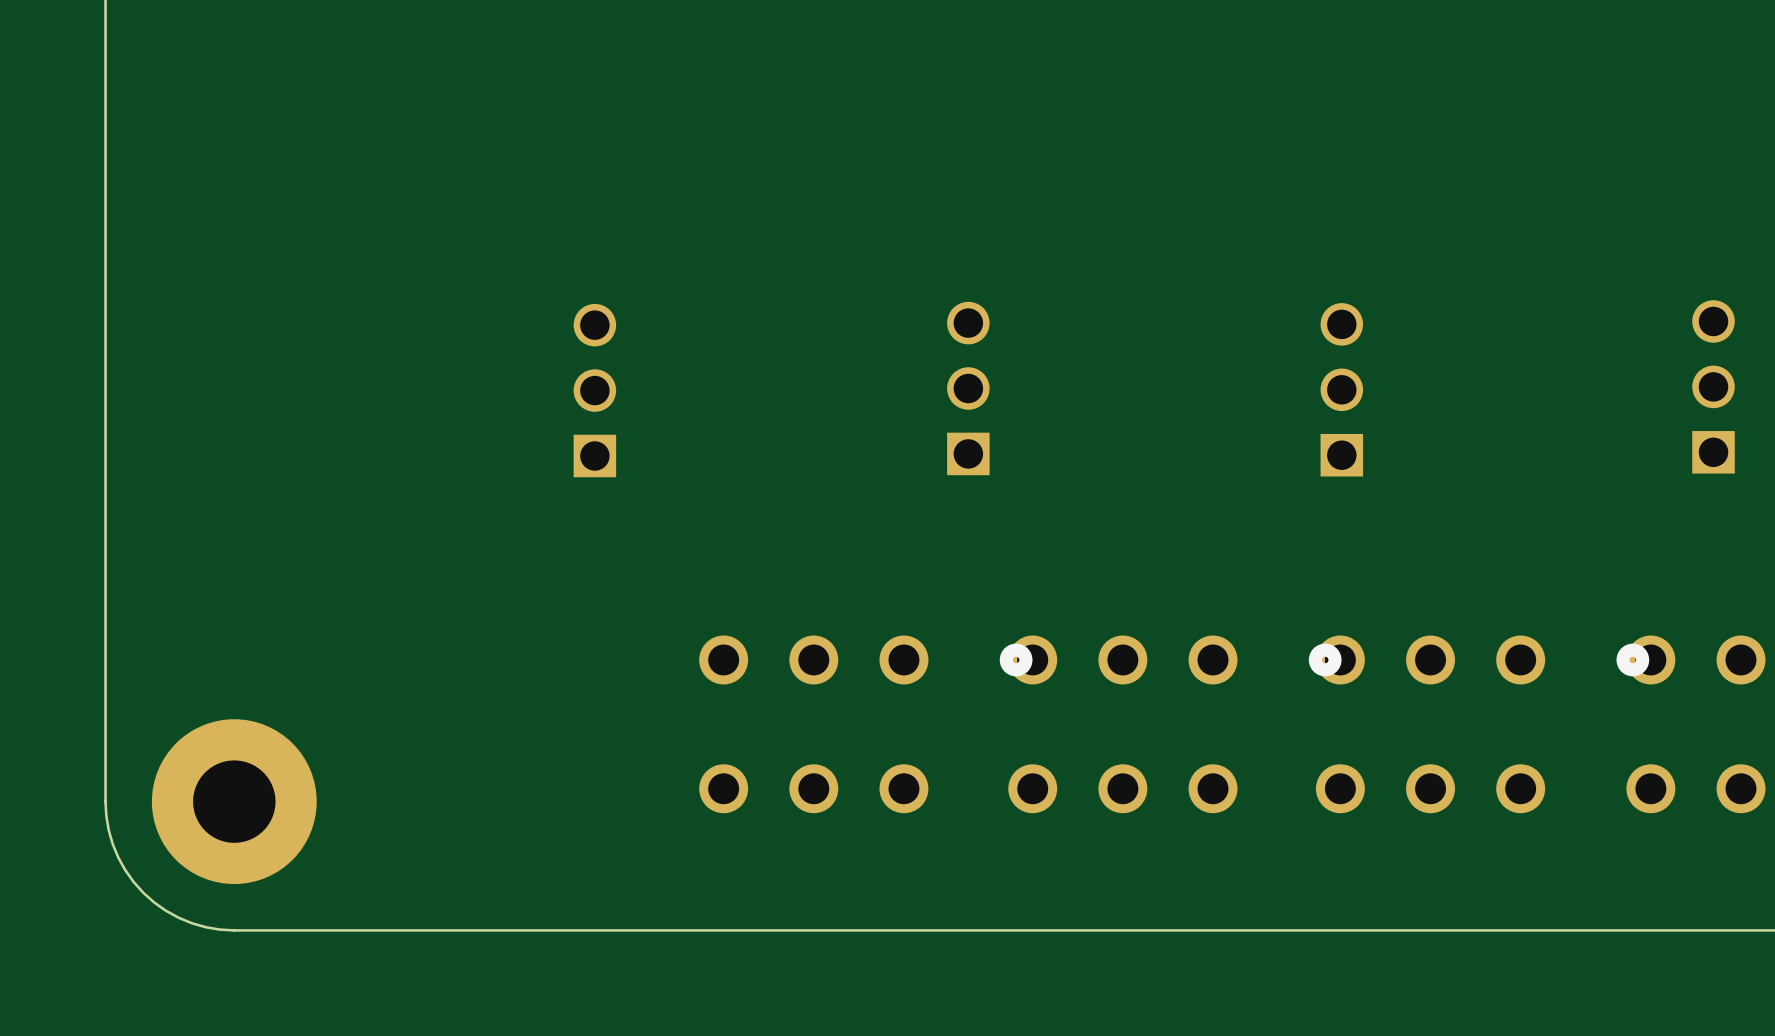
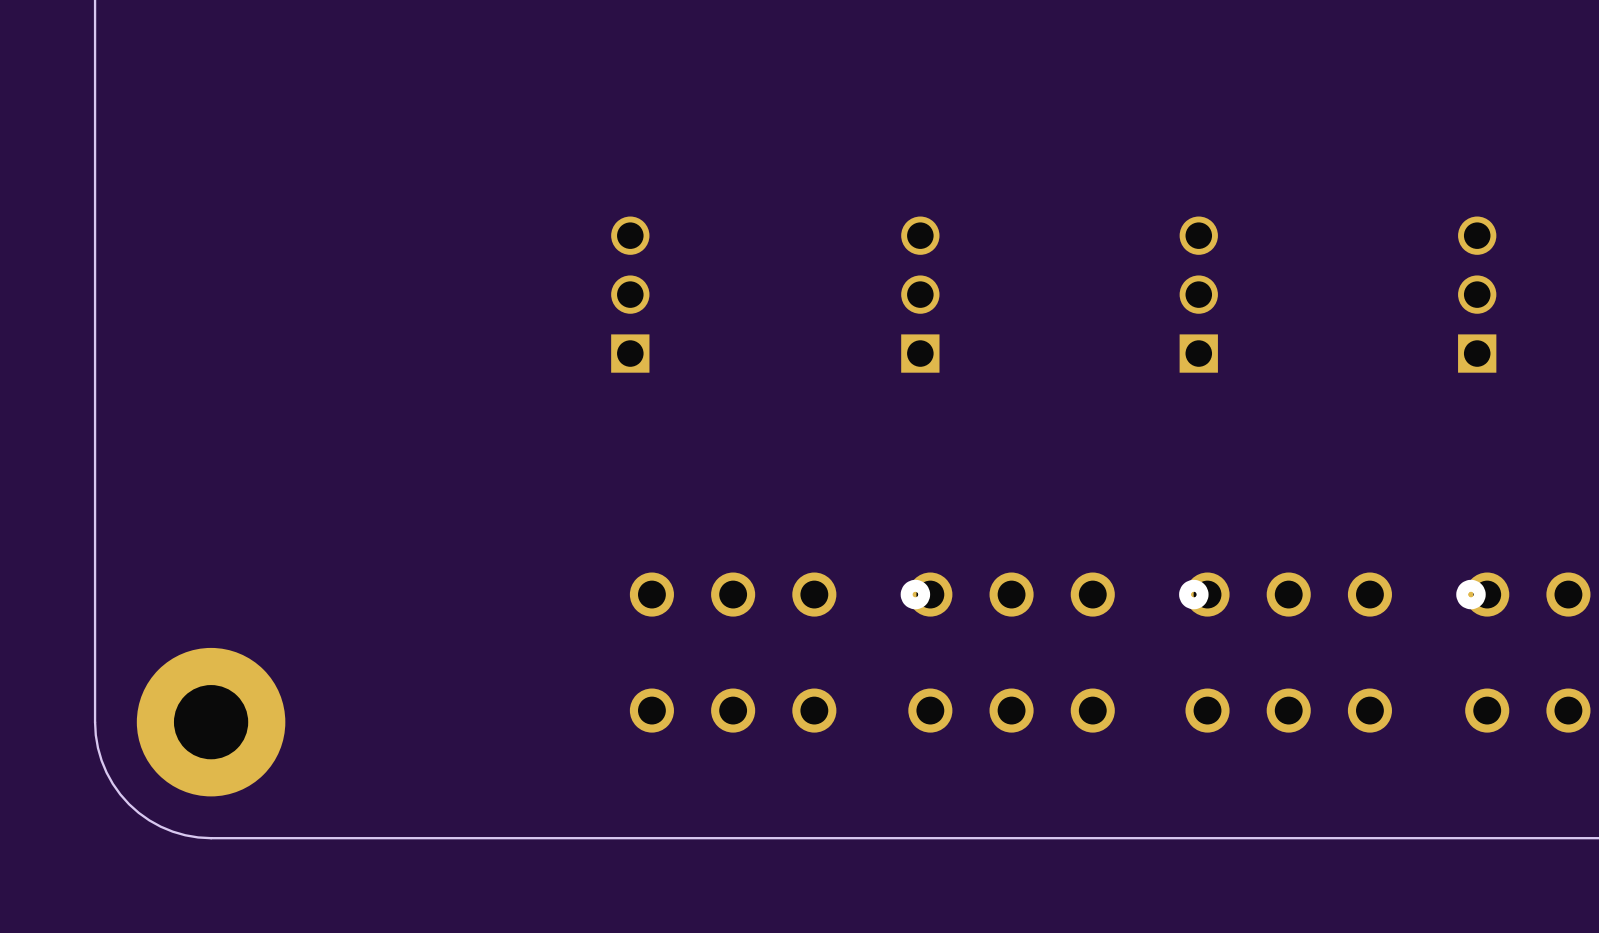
part position: (1713, 386) -> (1477, 294)
part position: (968, 388) -> (920, 294)
part position: (1341, 389) -> (1198, 294)
part position: (594, 390) -> (630, 294)

